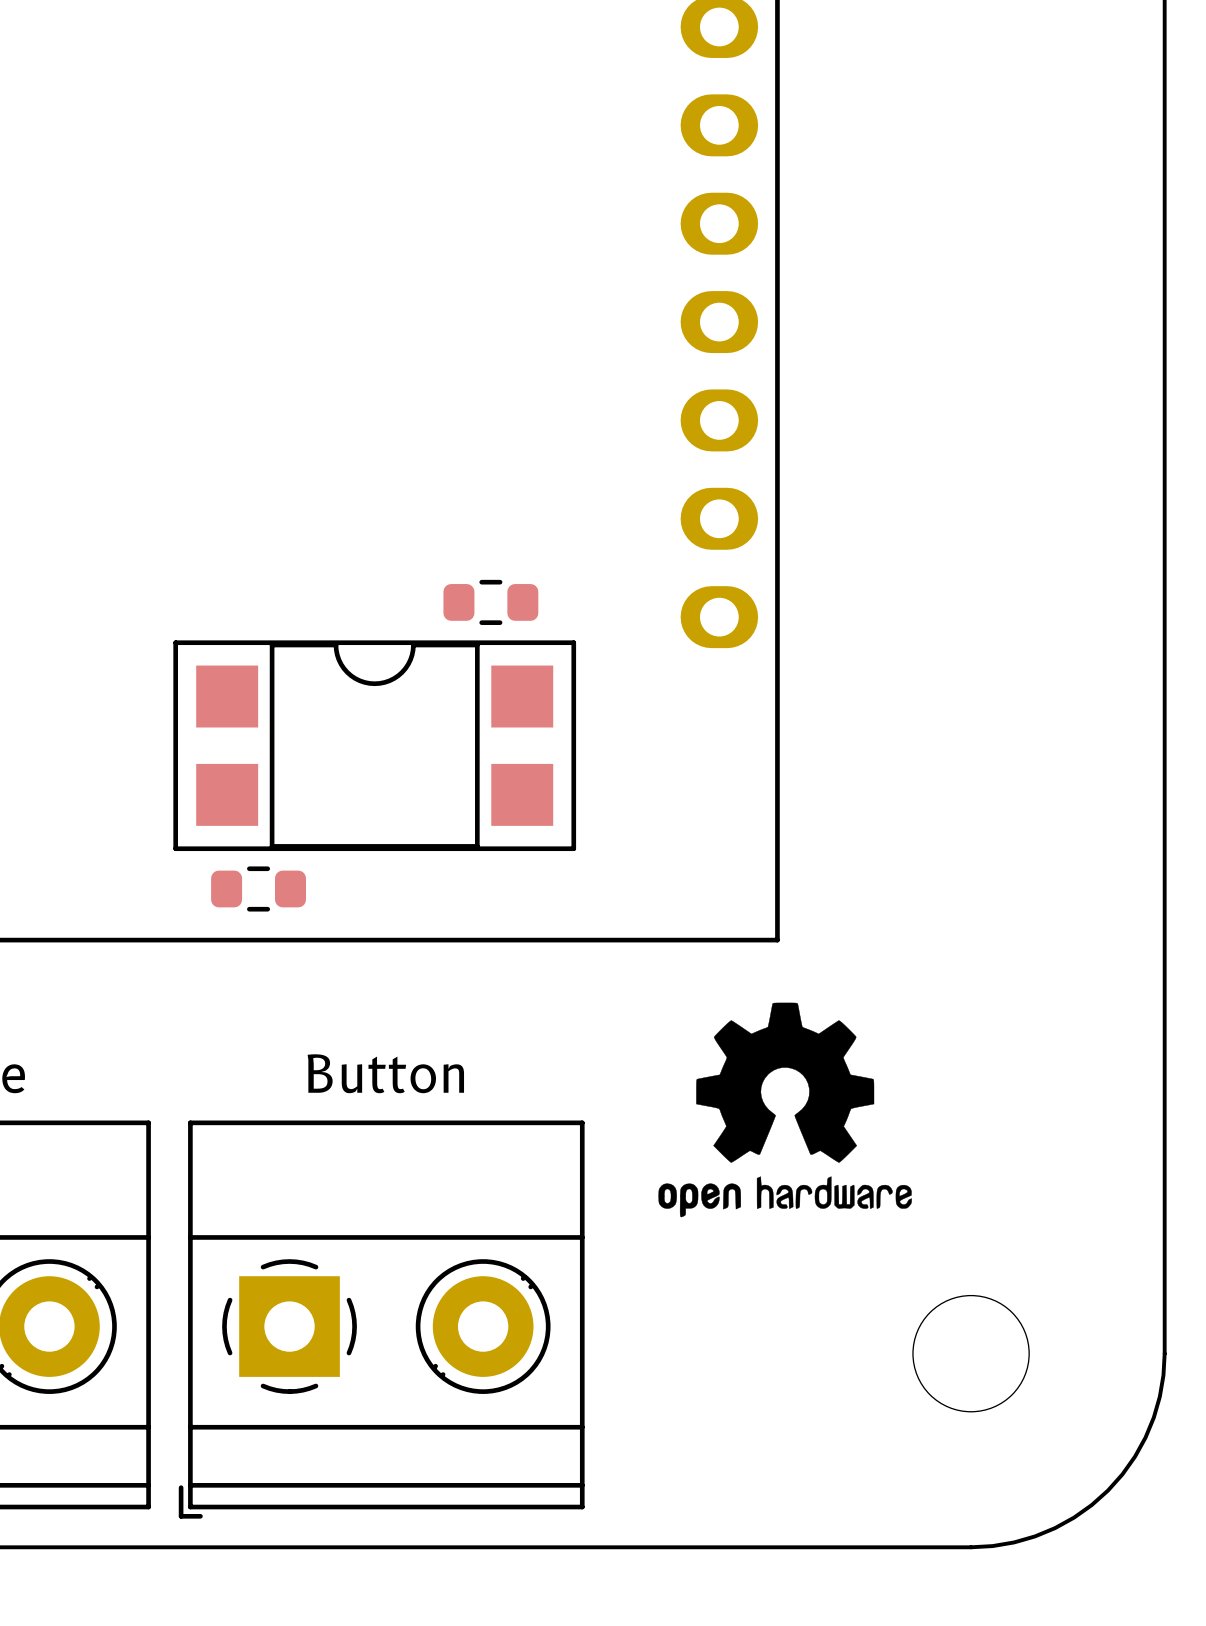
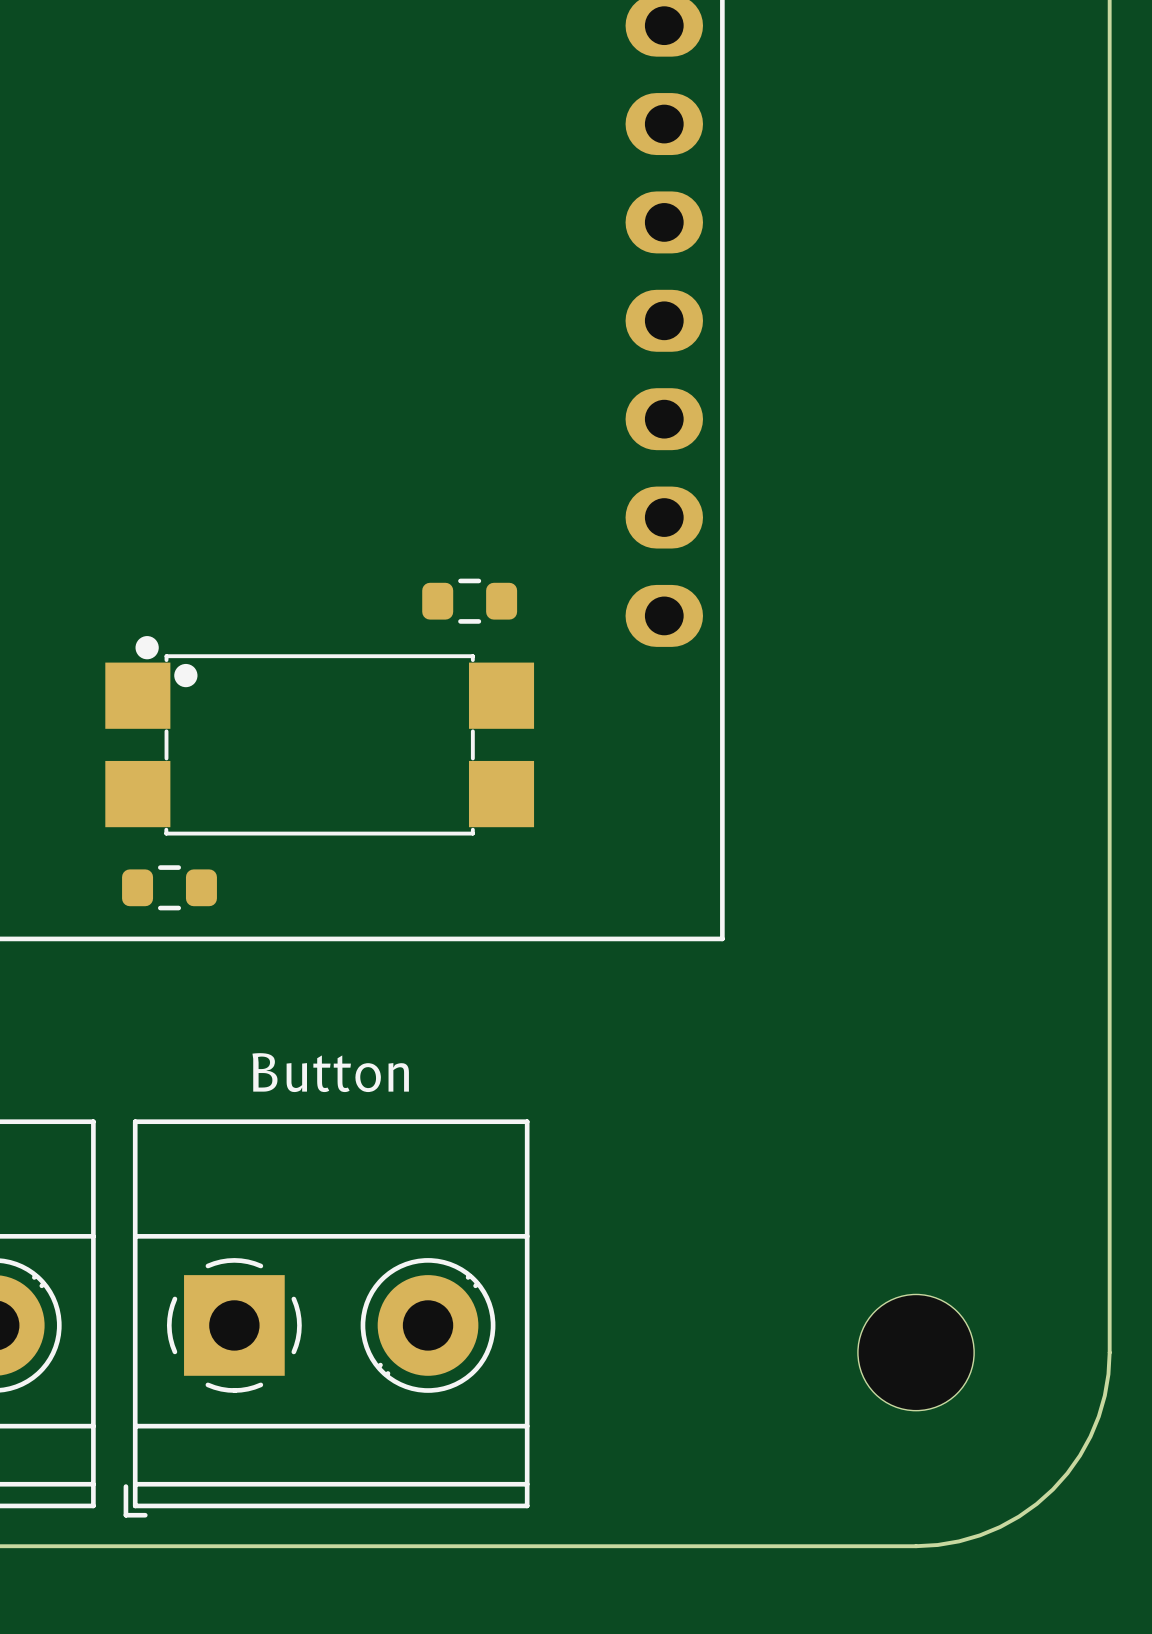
part position: (490, 602) -> (469, 601)
part footprint: [173, 640, 577, 852] -> [105, 636, 535, 836]
part position: (258, 888) -> (169, 887)
drawing: [658, 1002, 912, 1218] -> none

